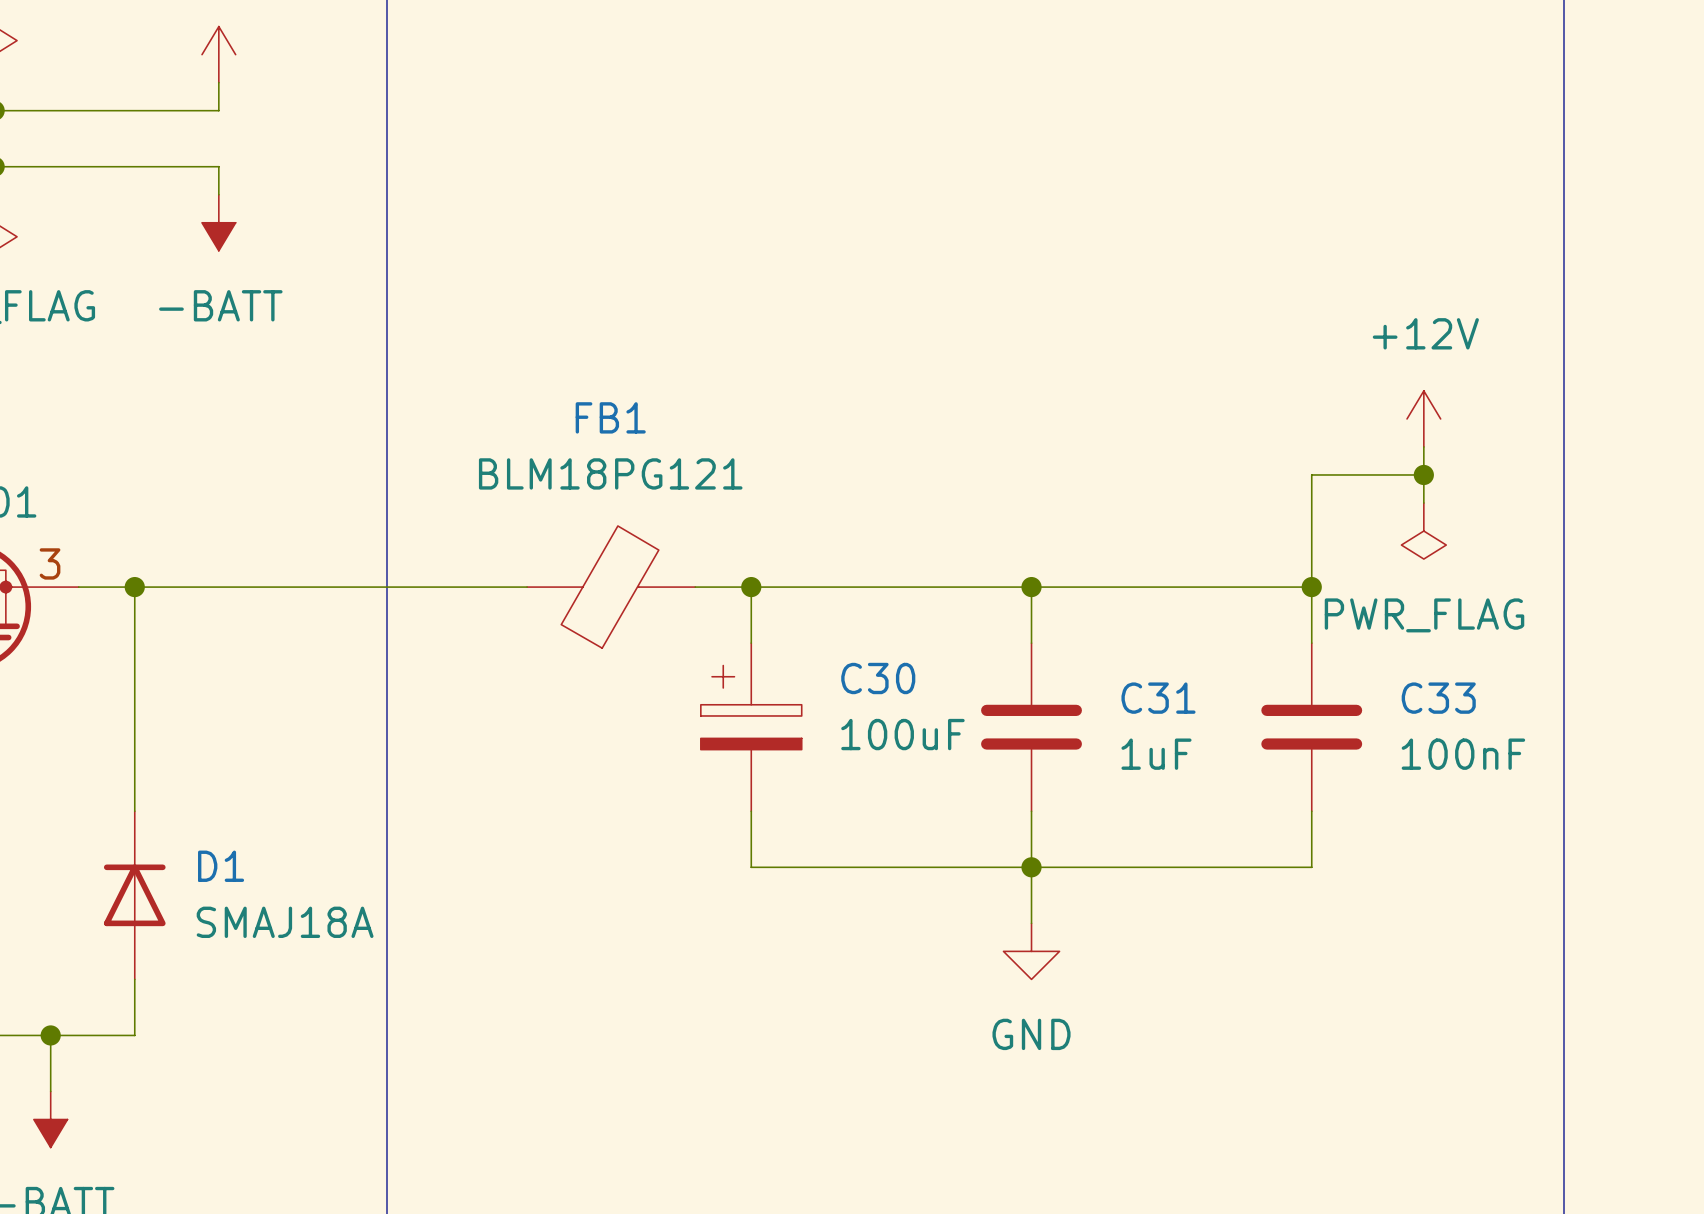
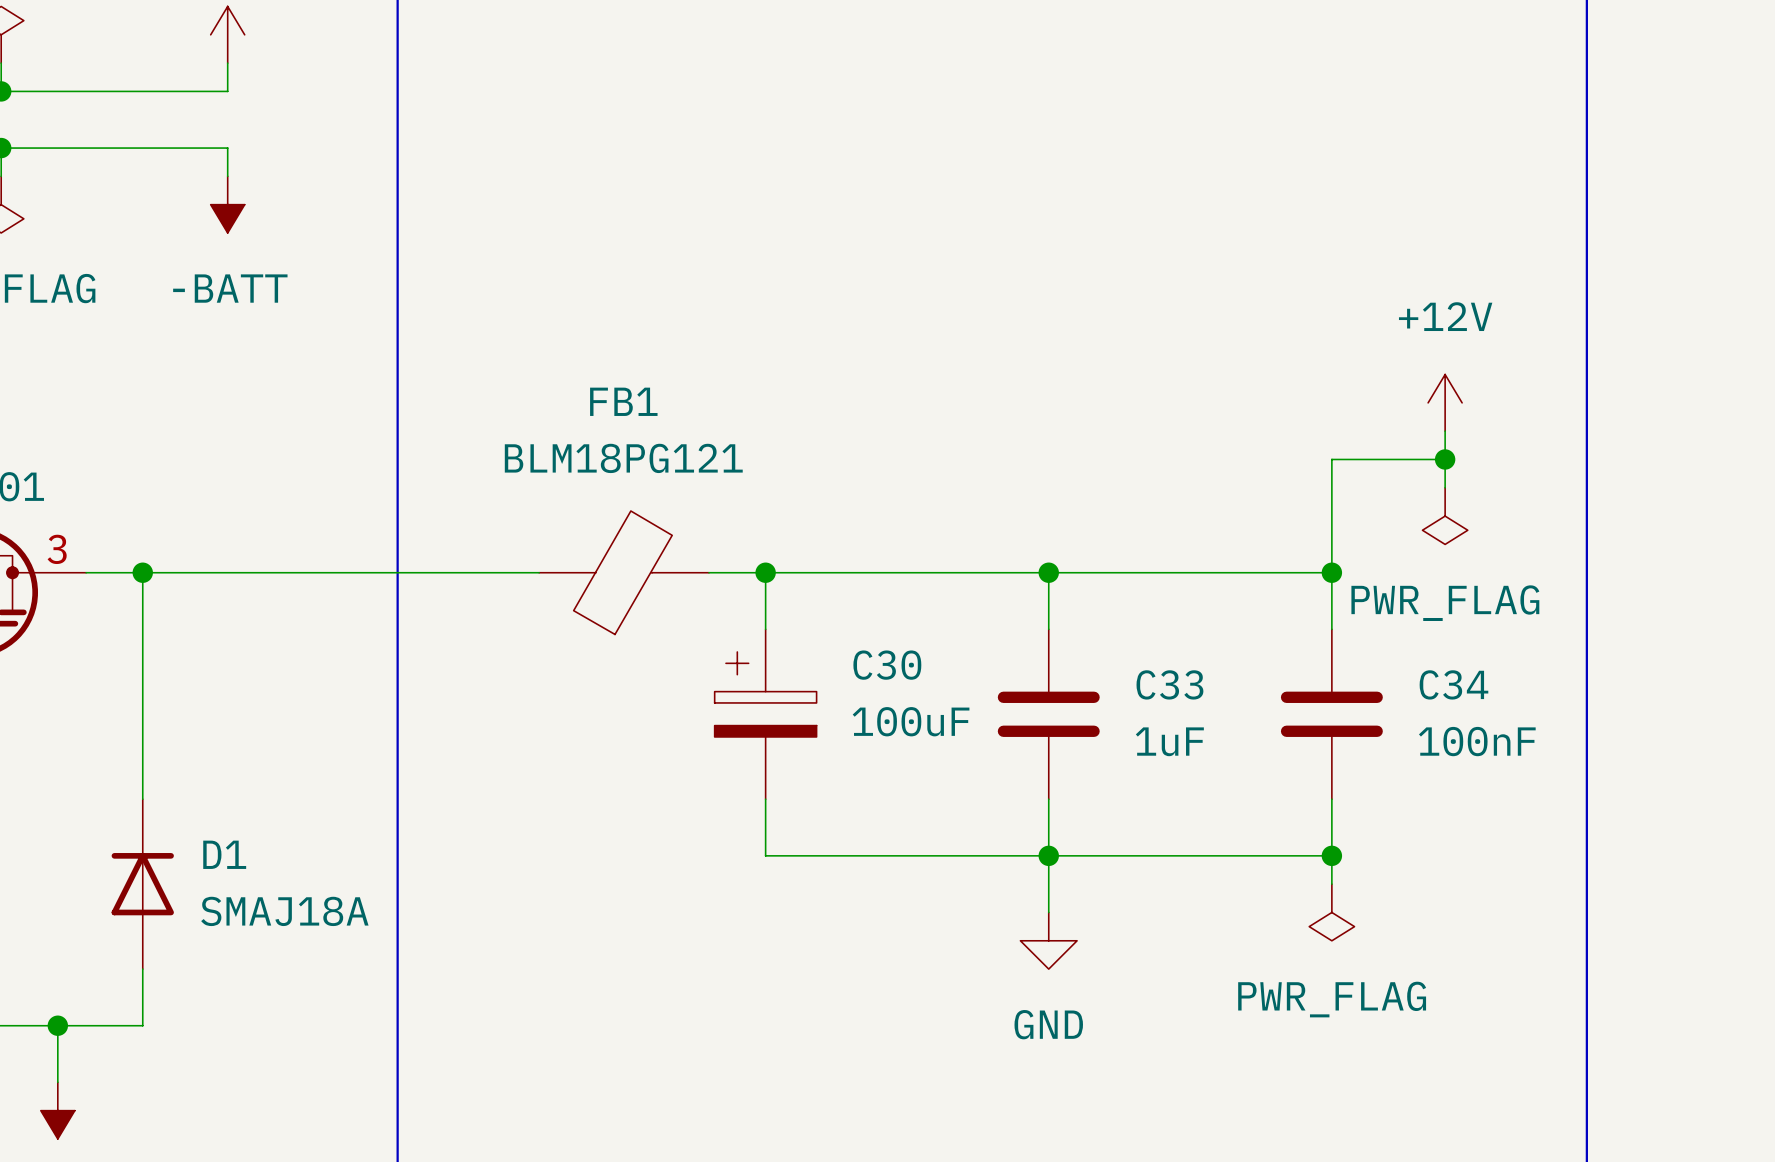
C31 name: C31 (1158, 698) -> C33 (1169, 684)
C33 name: C33 (1438, 698) -> C34 (1453, 684)
wire: none -> (1331, 855) (1331, 884)
junction: none -> (1331, 855)
power symbol: none -> PWR_FLAG (1331, 912)

